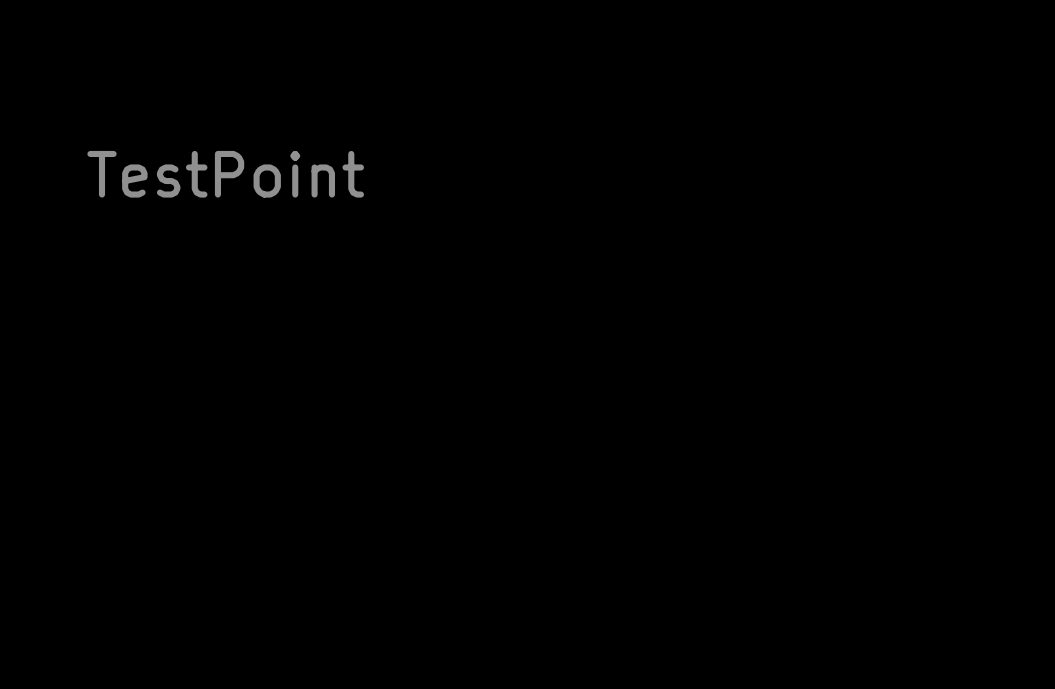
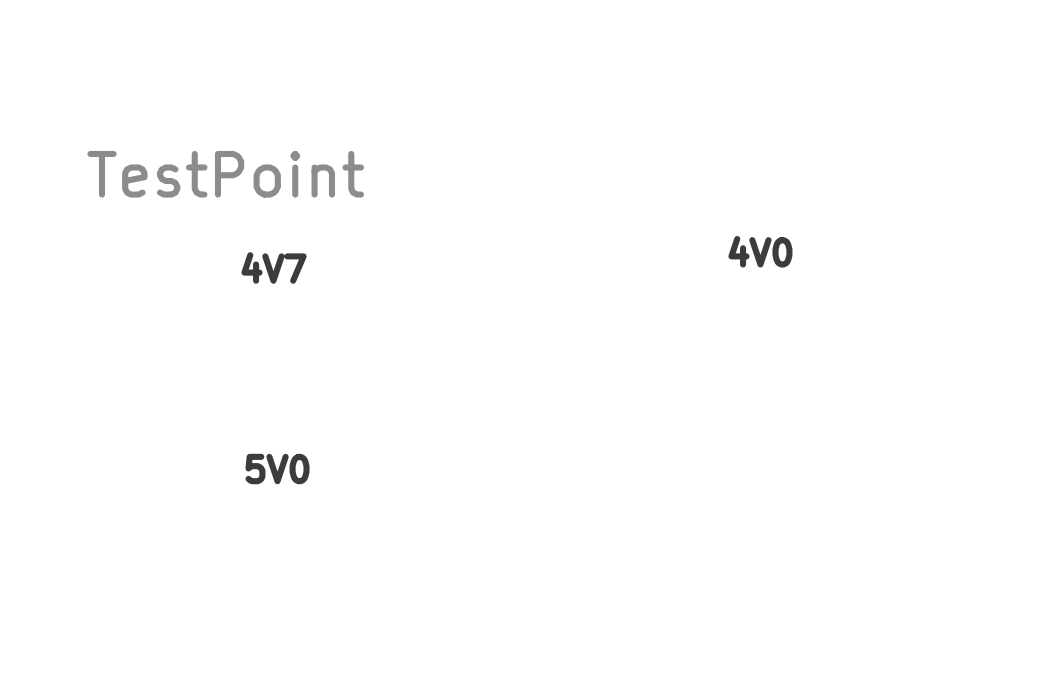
text: none -> 4V0 (760, 251)
text: none -> 4V7 (274, 267)
text: none -> 5V0 (277, 469)

